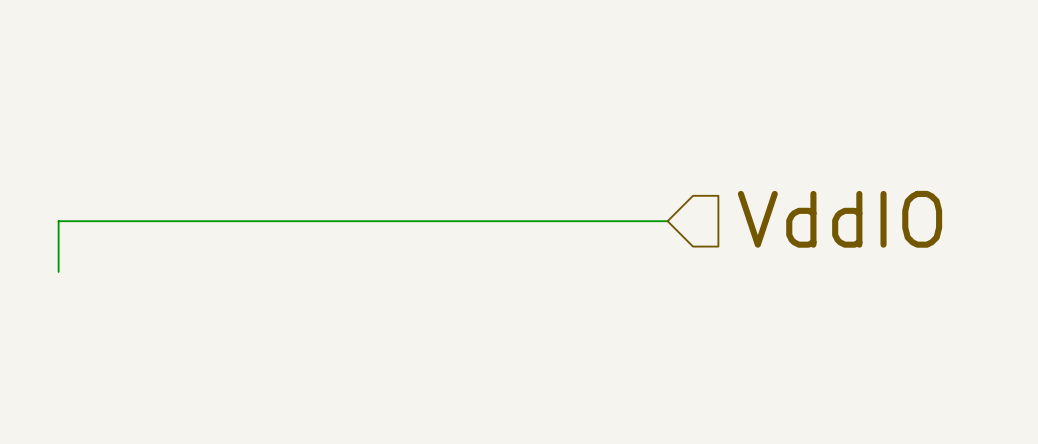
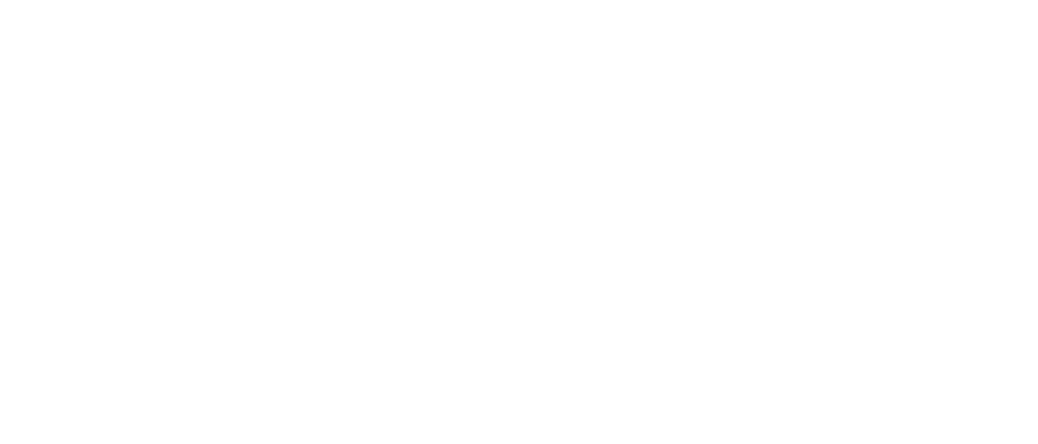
hierarchical label: VddIO (840, 219) -> none
wire: (667, 221) (58, 221) (58, 271) -> none

